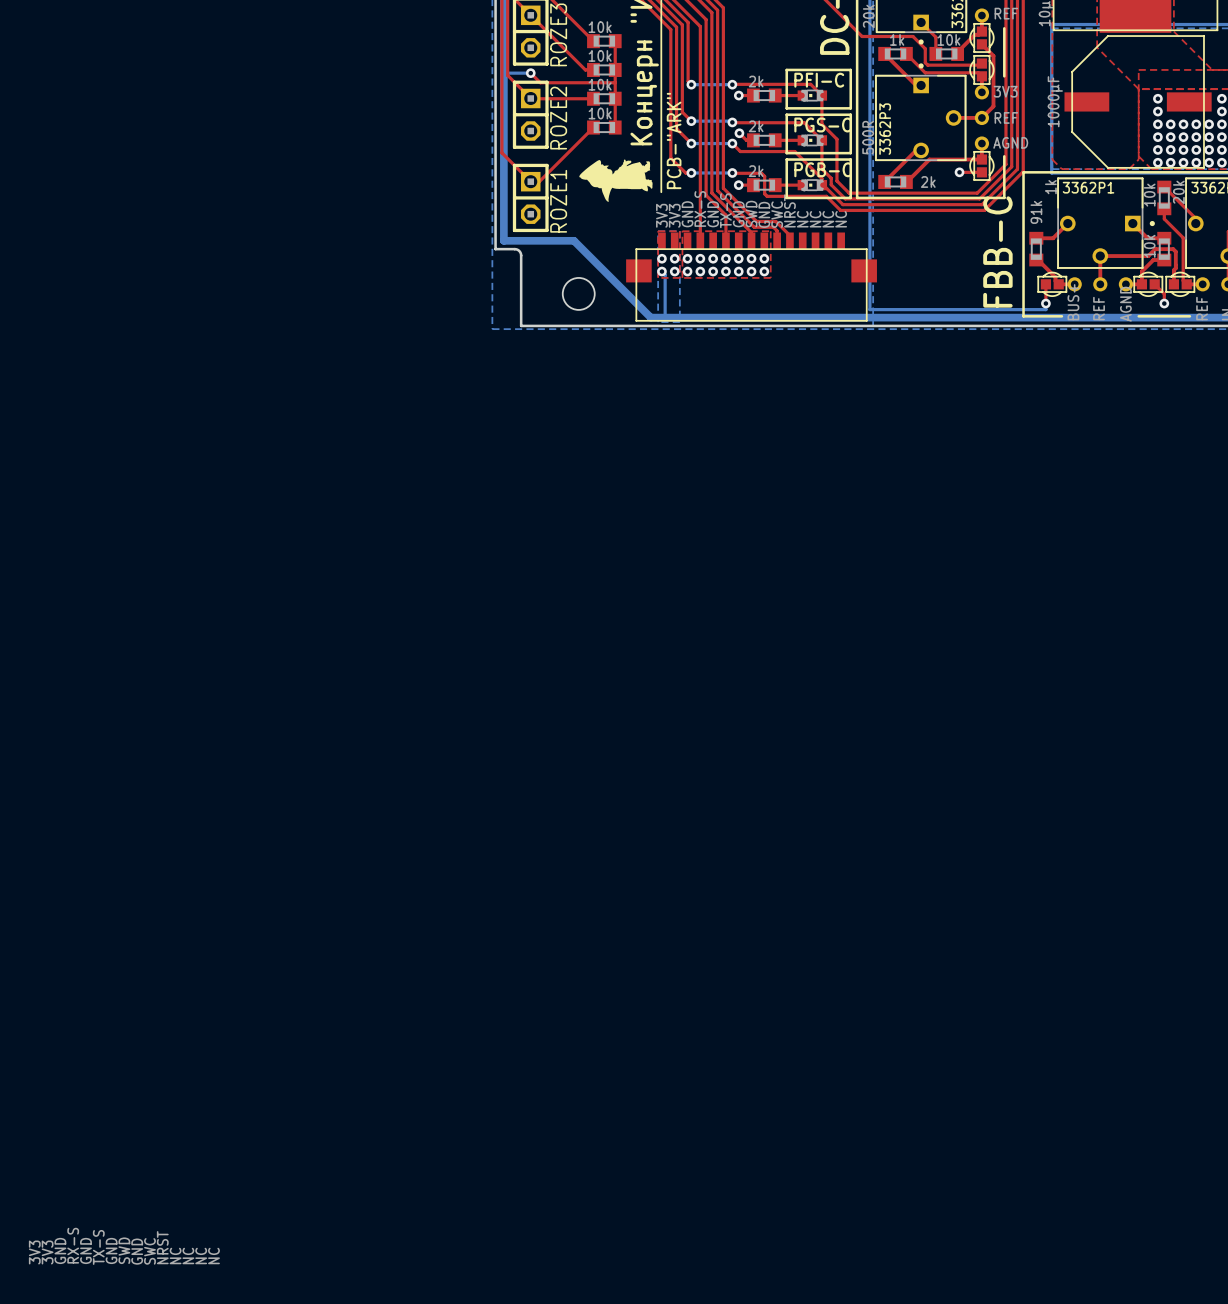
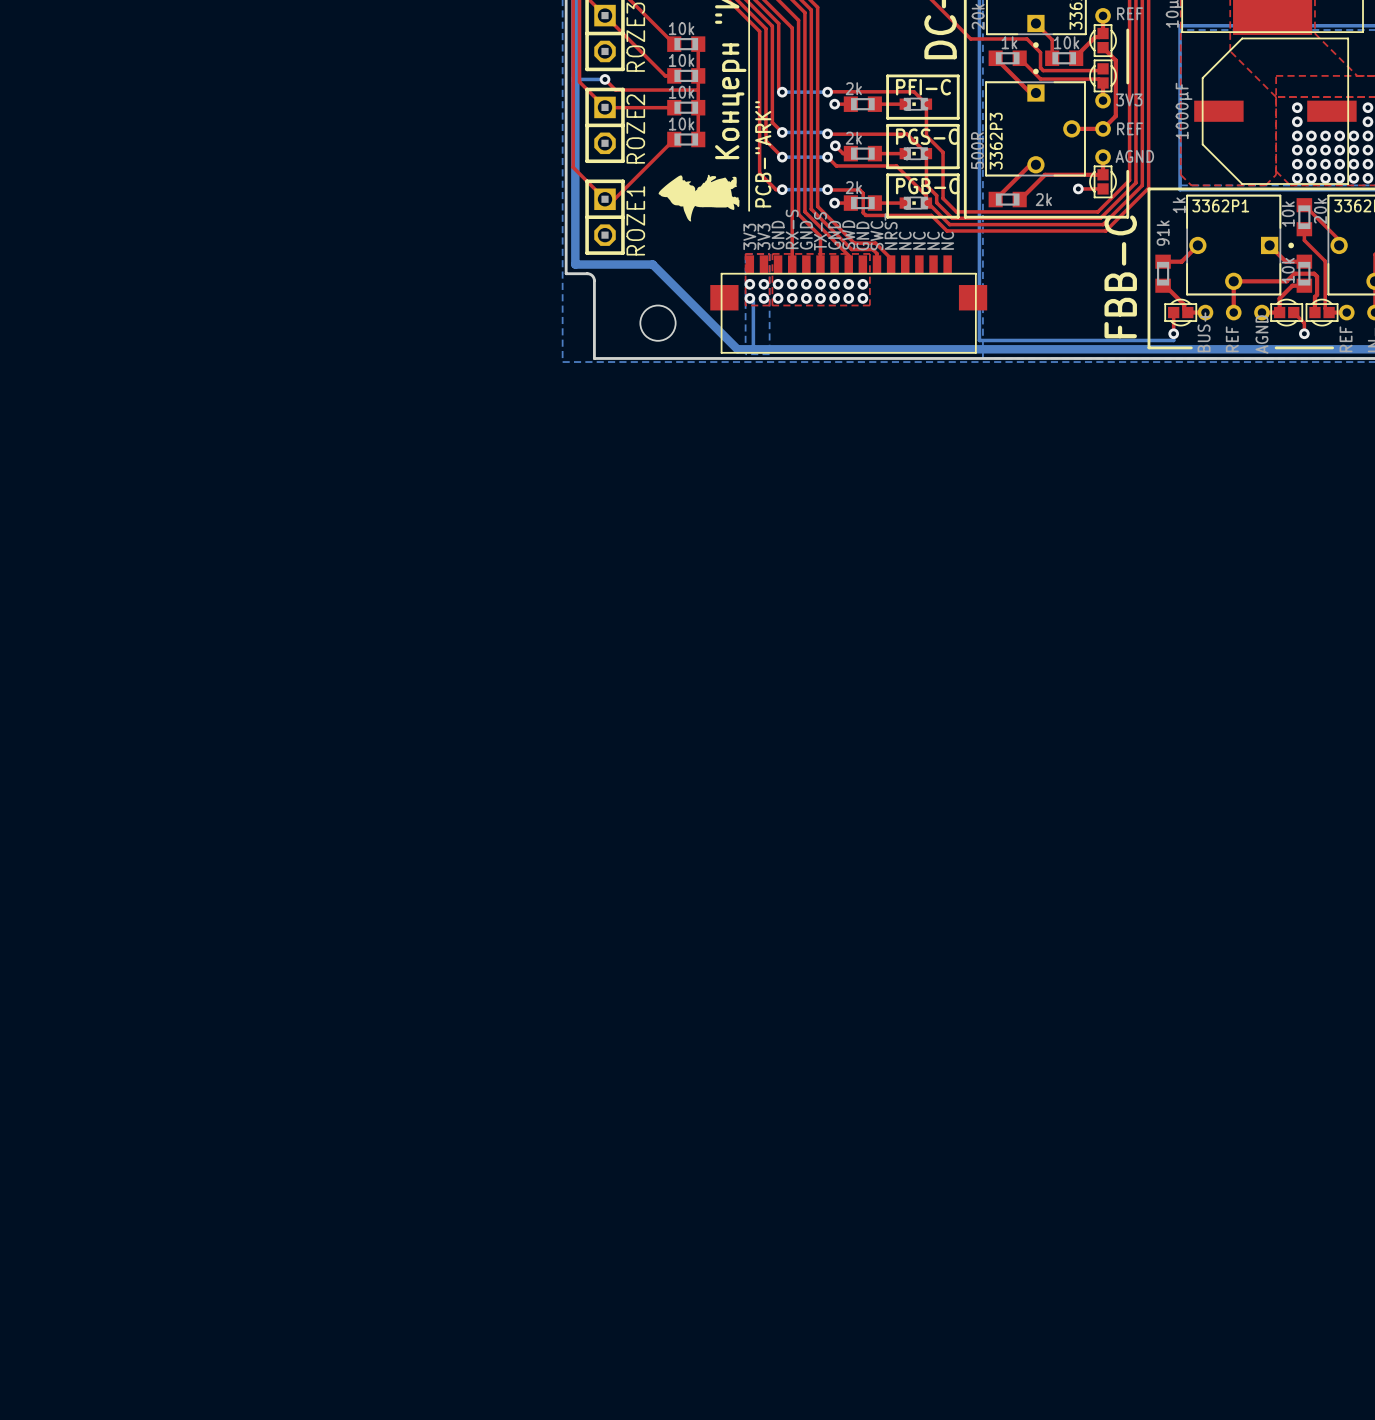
text: RX-S (73, 1245) -> none
text: TX-S (98, 1247) -> none
text: NRST (162, 1247) -> none
text: GND (60, 1250) -> none
text: GND (85, 1250) -> none
text: GND (111, 1250) -> none
text: SWD (124, 1250) -> none
text: GND (137, 1251) -> none
text: SWC (149, 1251) -> none
text: 3V3 (34, 1252) -> none
text: 3V3 (47, 1252) -> none
text: NC (175, 1255) -> none
text: NC (188, 1255) -> none
text: NC (201, 1255) -> none
text: NC (213, 1255) -> none

